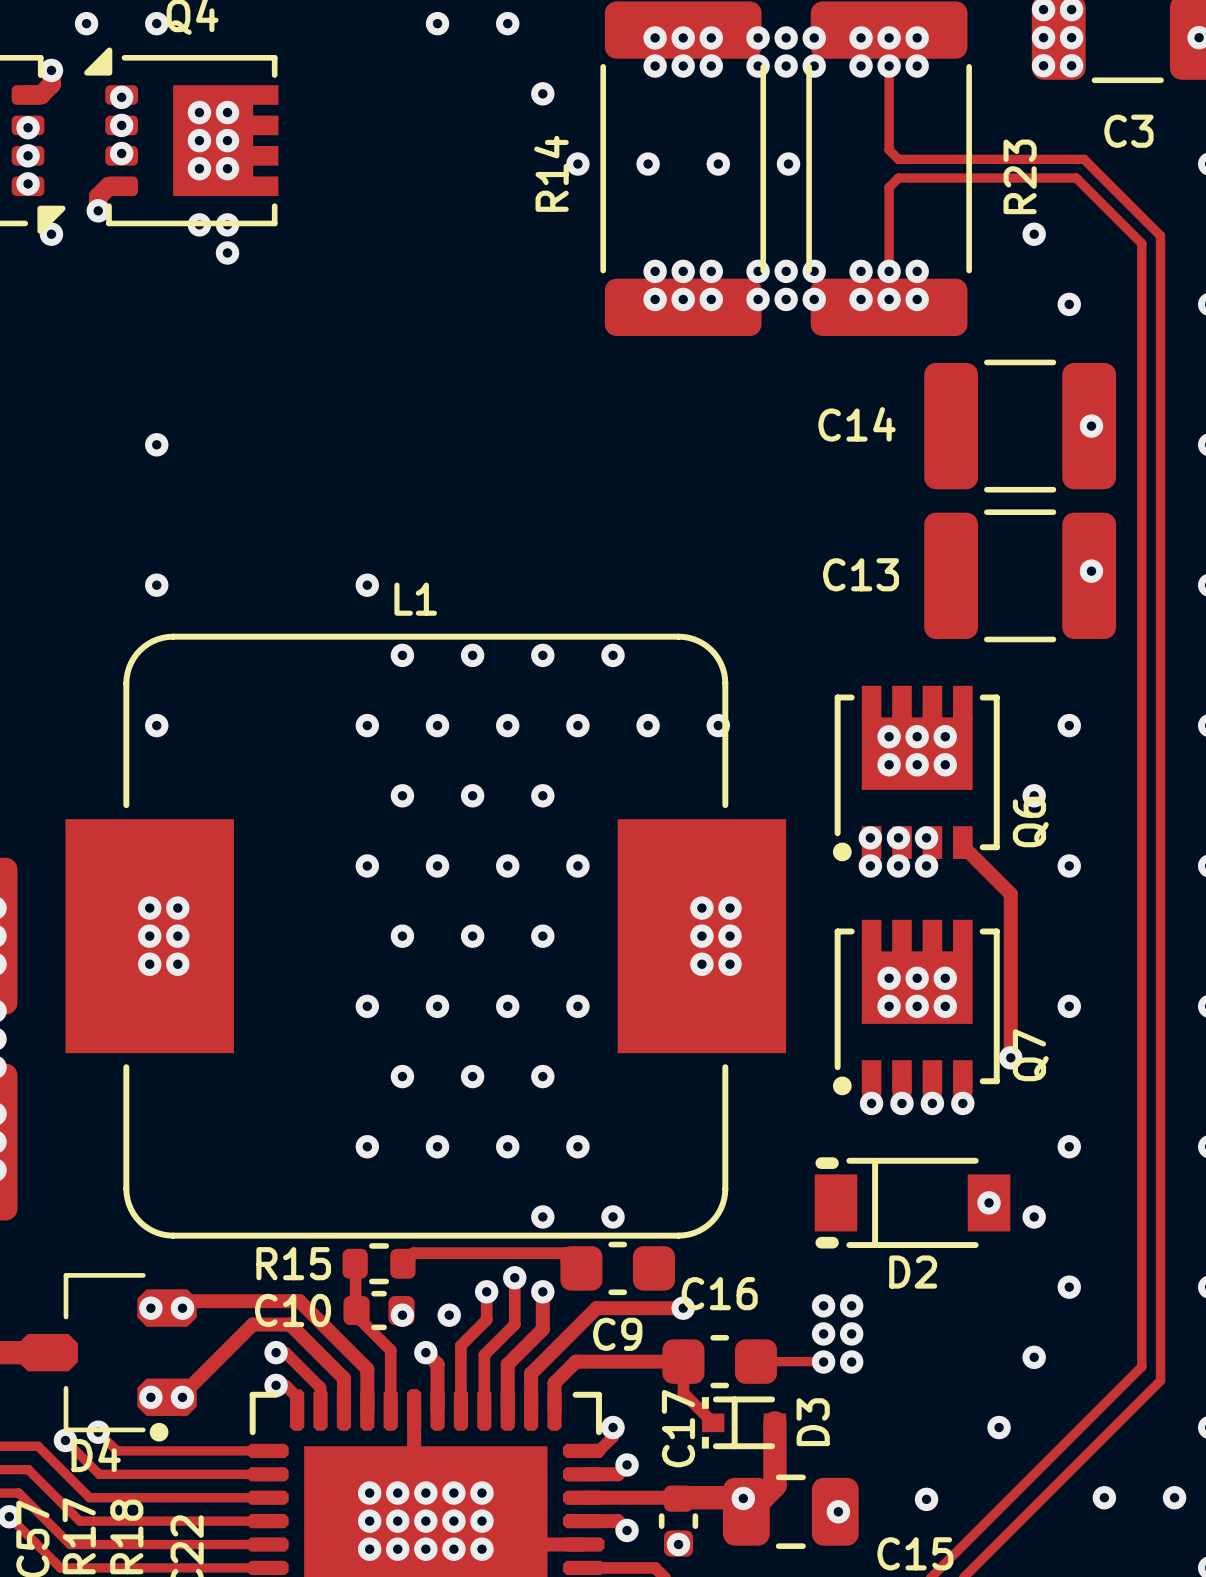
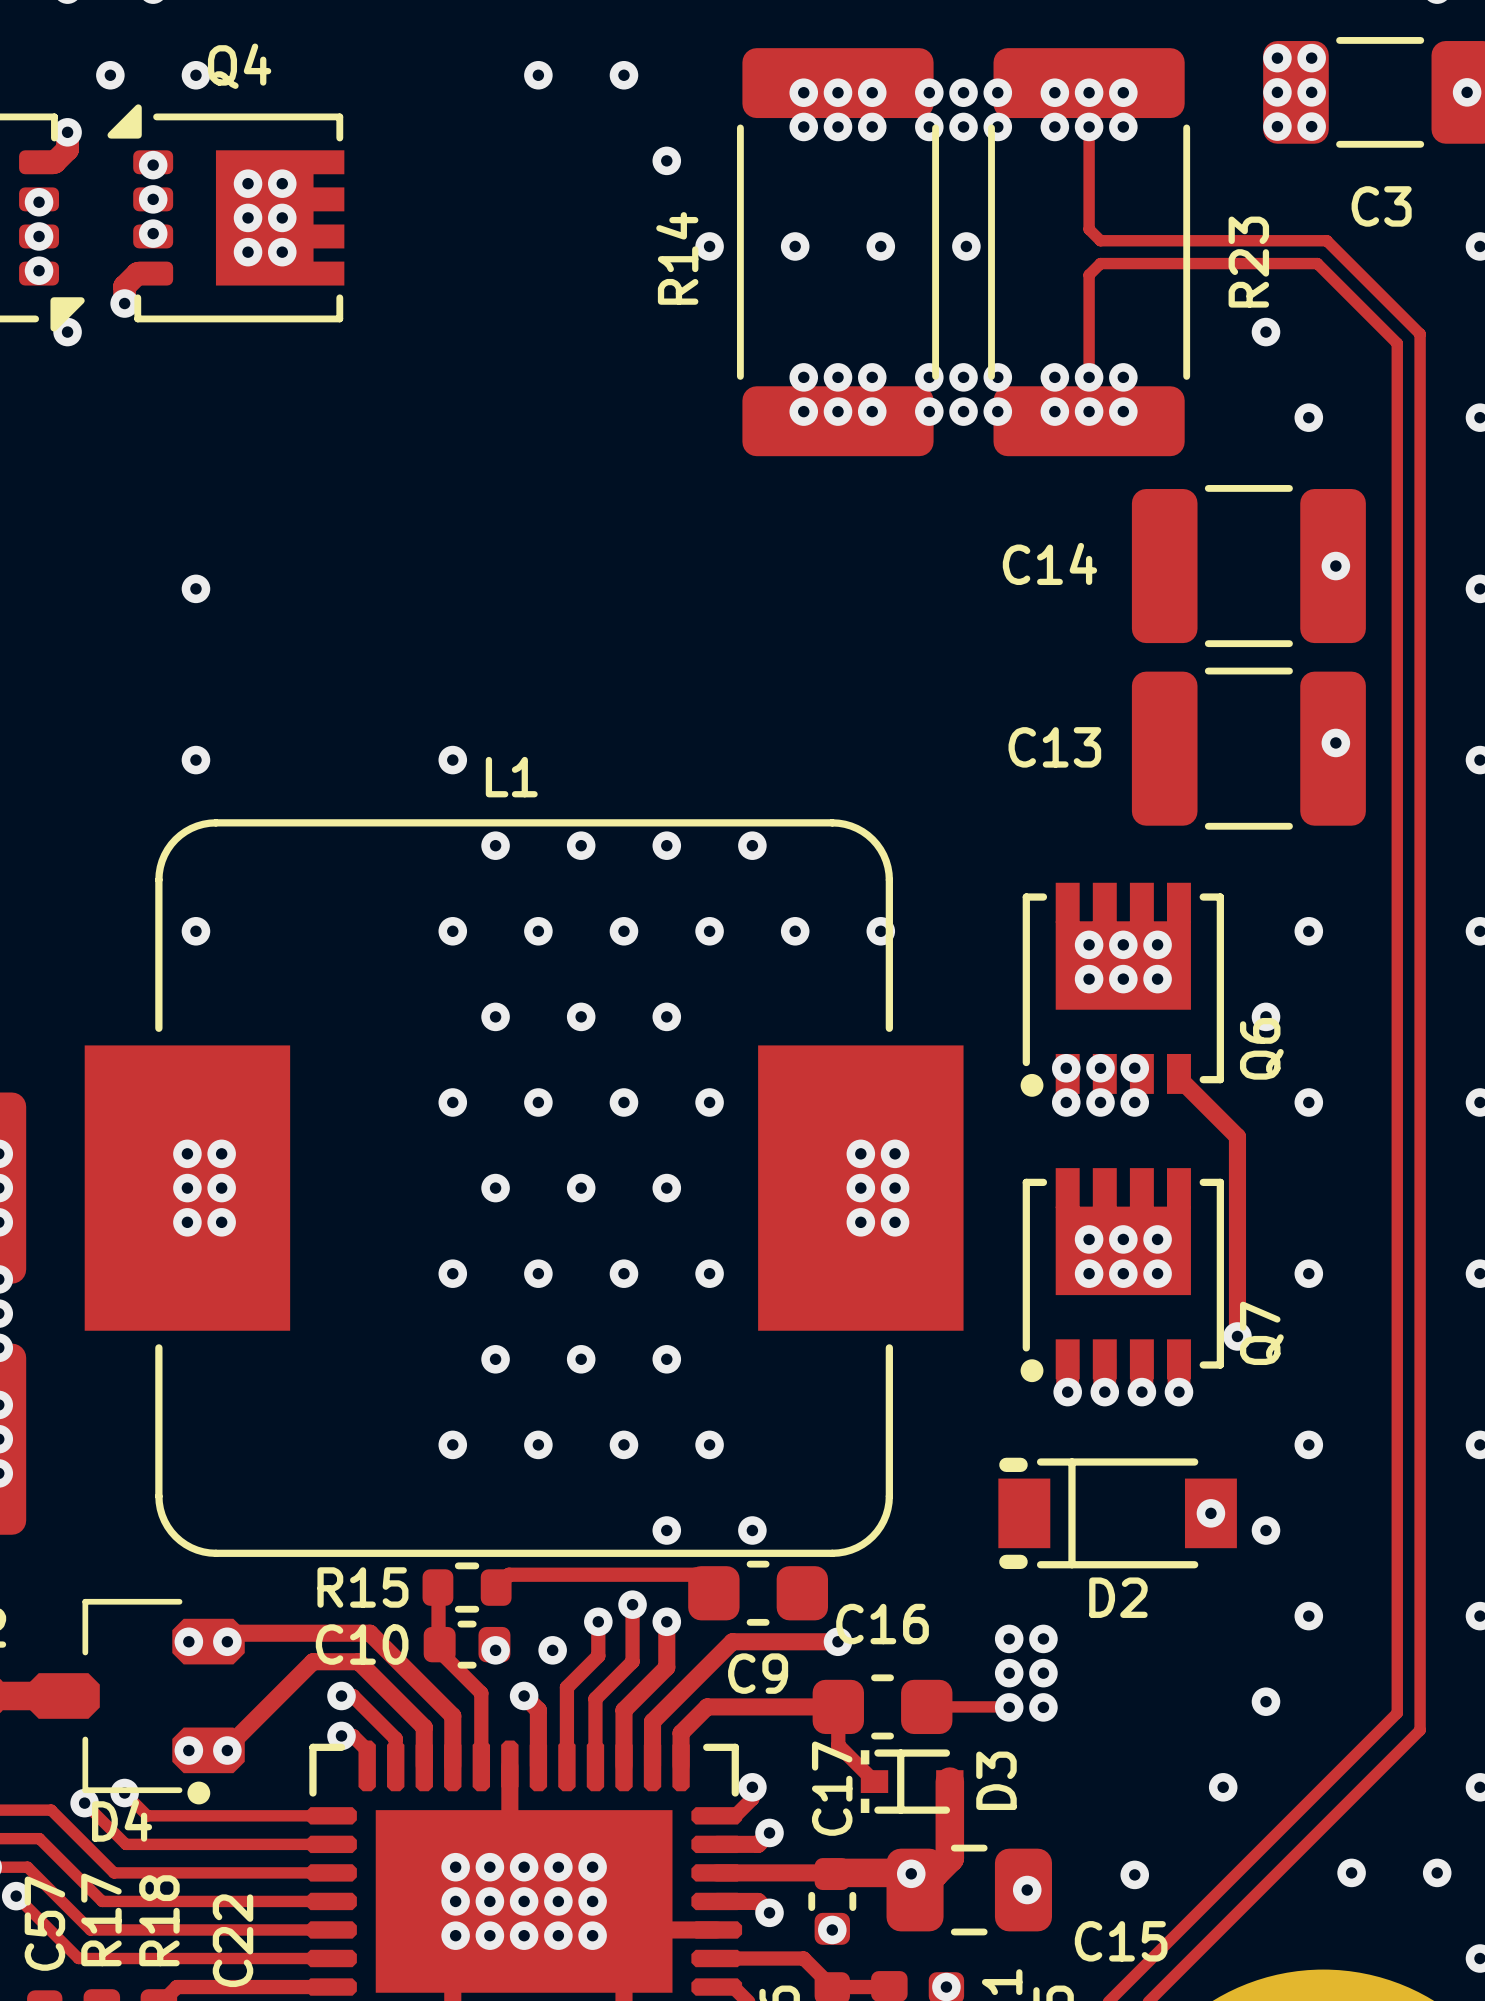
via: (199, 224) -> none
via: (227, 224) -> none
via: (227, 252) -> none

